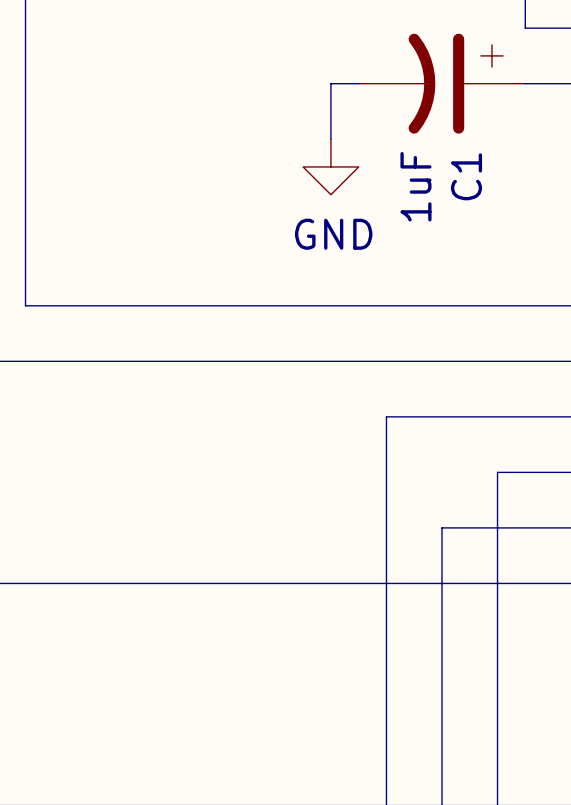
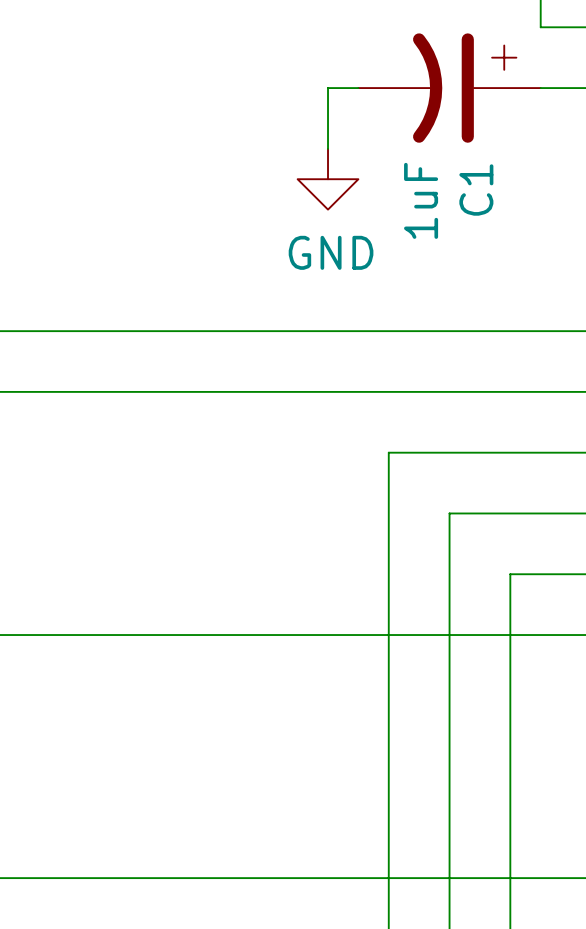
wire: (497, 472) (497, 527) (441, 527) -> (510, 513) (449, 513) (449, 574)

